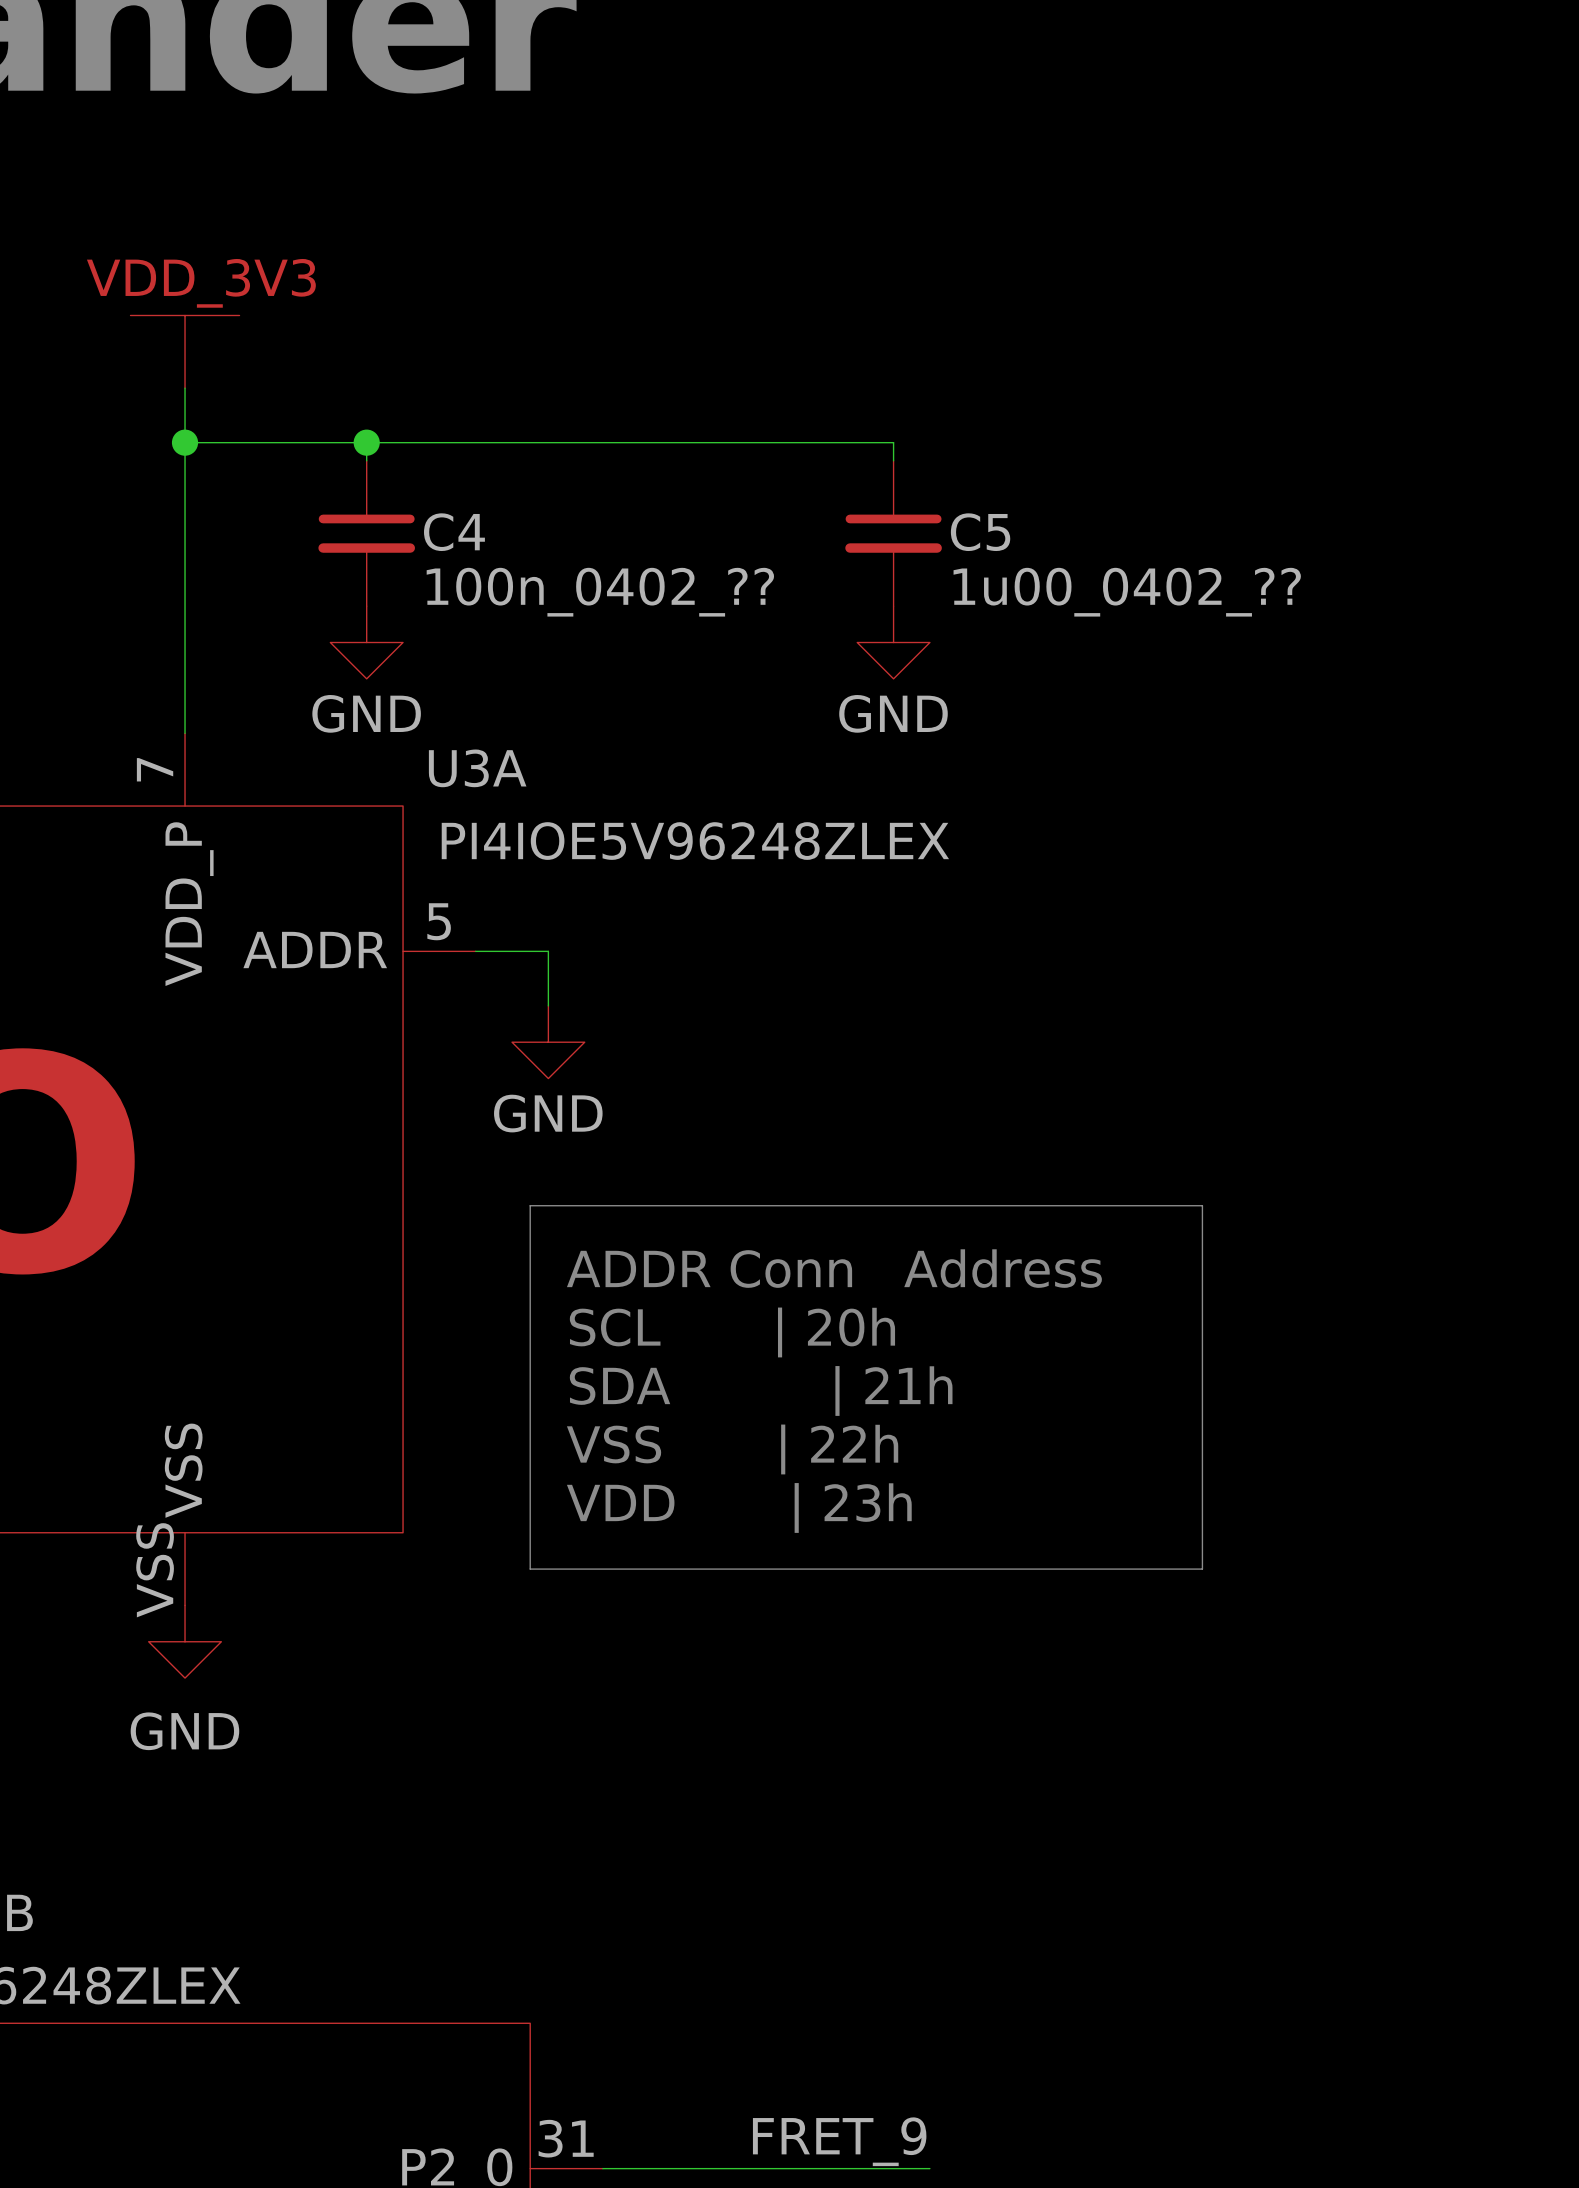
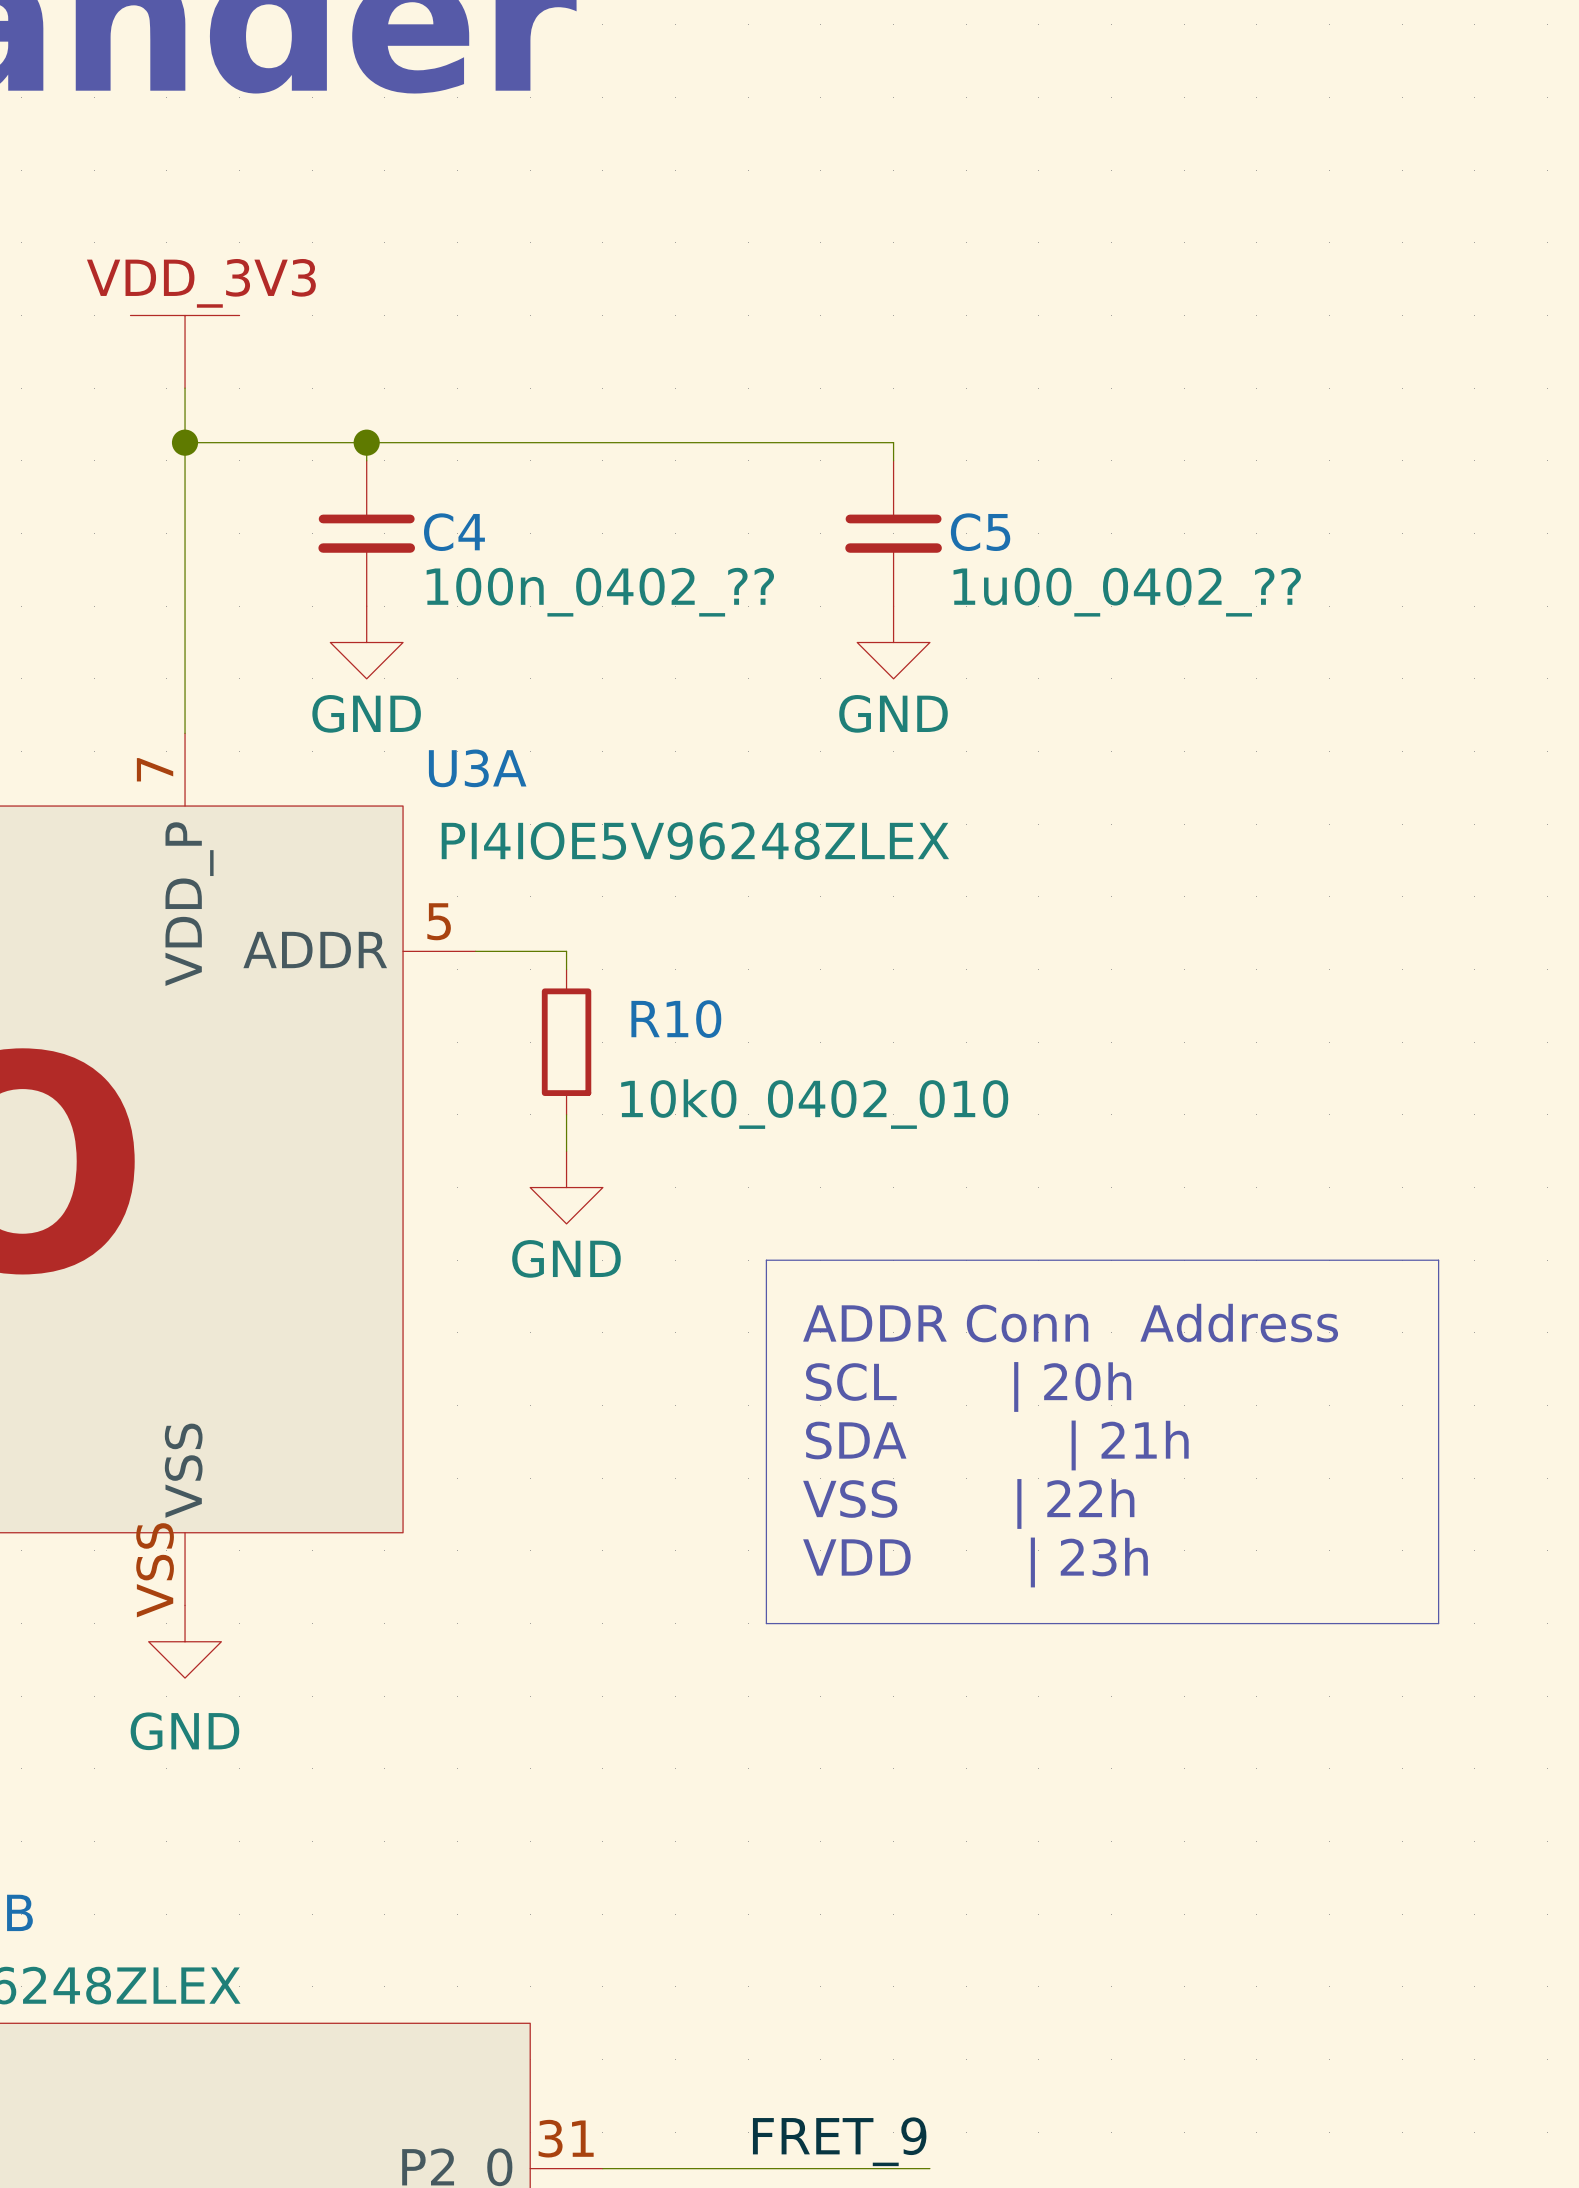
wire: (548, 951) (548, 1005) -> (548, 951) (566, 951) (566, 969)
power symbol position: GND (548, 1042) -> GND (566, 1187)
R10: none -> 10k0_0402_010 (566, 1042)
wire: none -> (566, 1114) (566, 1151)
line: (530, 1205) (1202, 1205) (1202, 1569) (530, 1569) (530, 1205) -> (766, 1260) (1438, 1260) (1438, 1623) (766, 1623) (766, 1260)
text position: ADDR Conn Address (834, 1268) -> ADDR Conn Address (1070, 1323)
text position: SCL | 20h (732, 1332) -> SCL | 20h (968, 1386)
text position: SDA | 21h (761, 1390) -> SDA | 21h (997, 1445)
text position: VSS | 22h (732, 1449) -> VSS | 22h (968, 1503)
text position: VDD | 23h (739, 1507) -> VDD | 23h (975, 1562)

